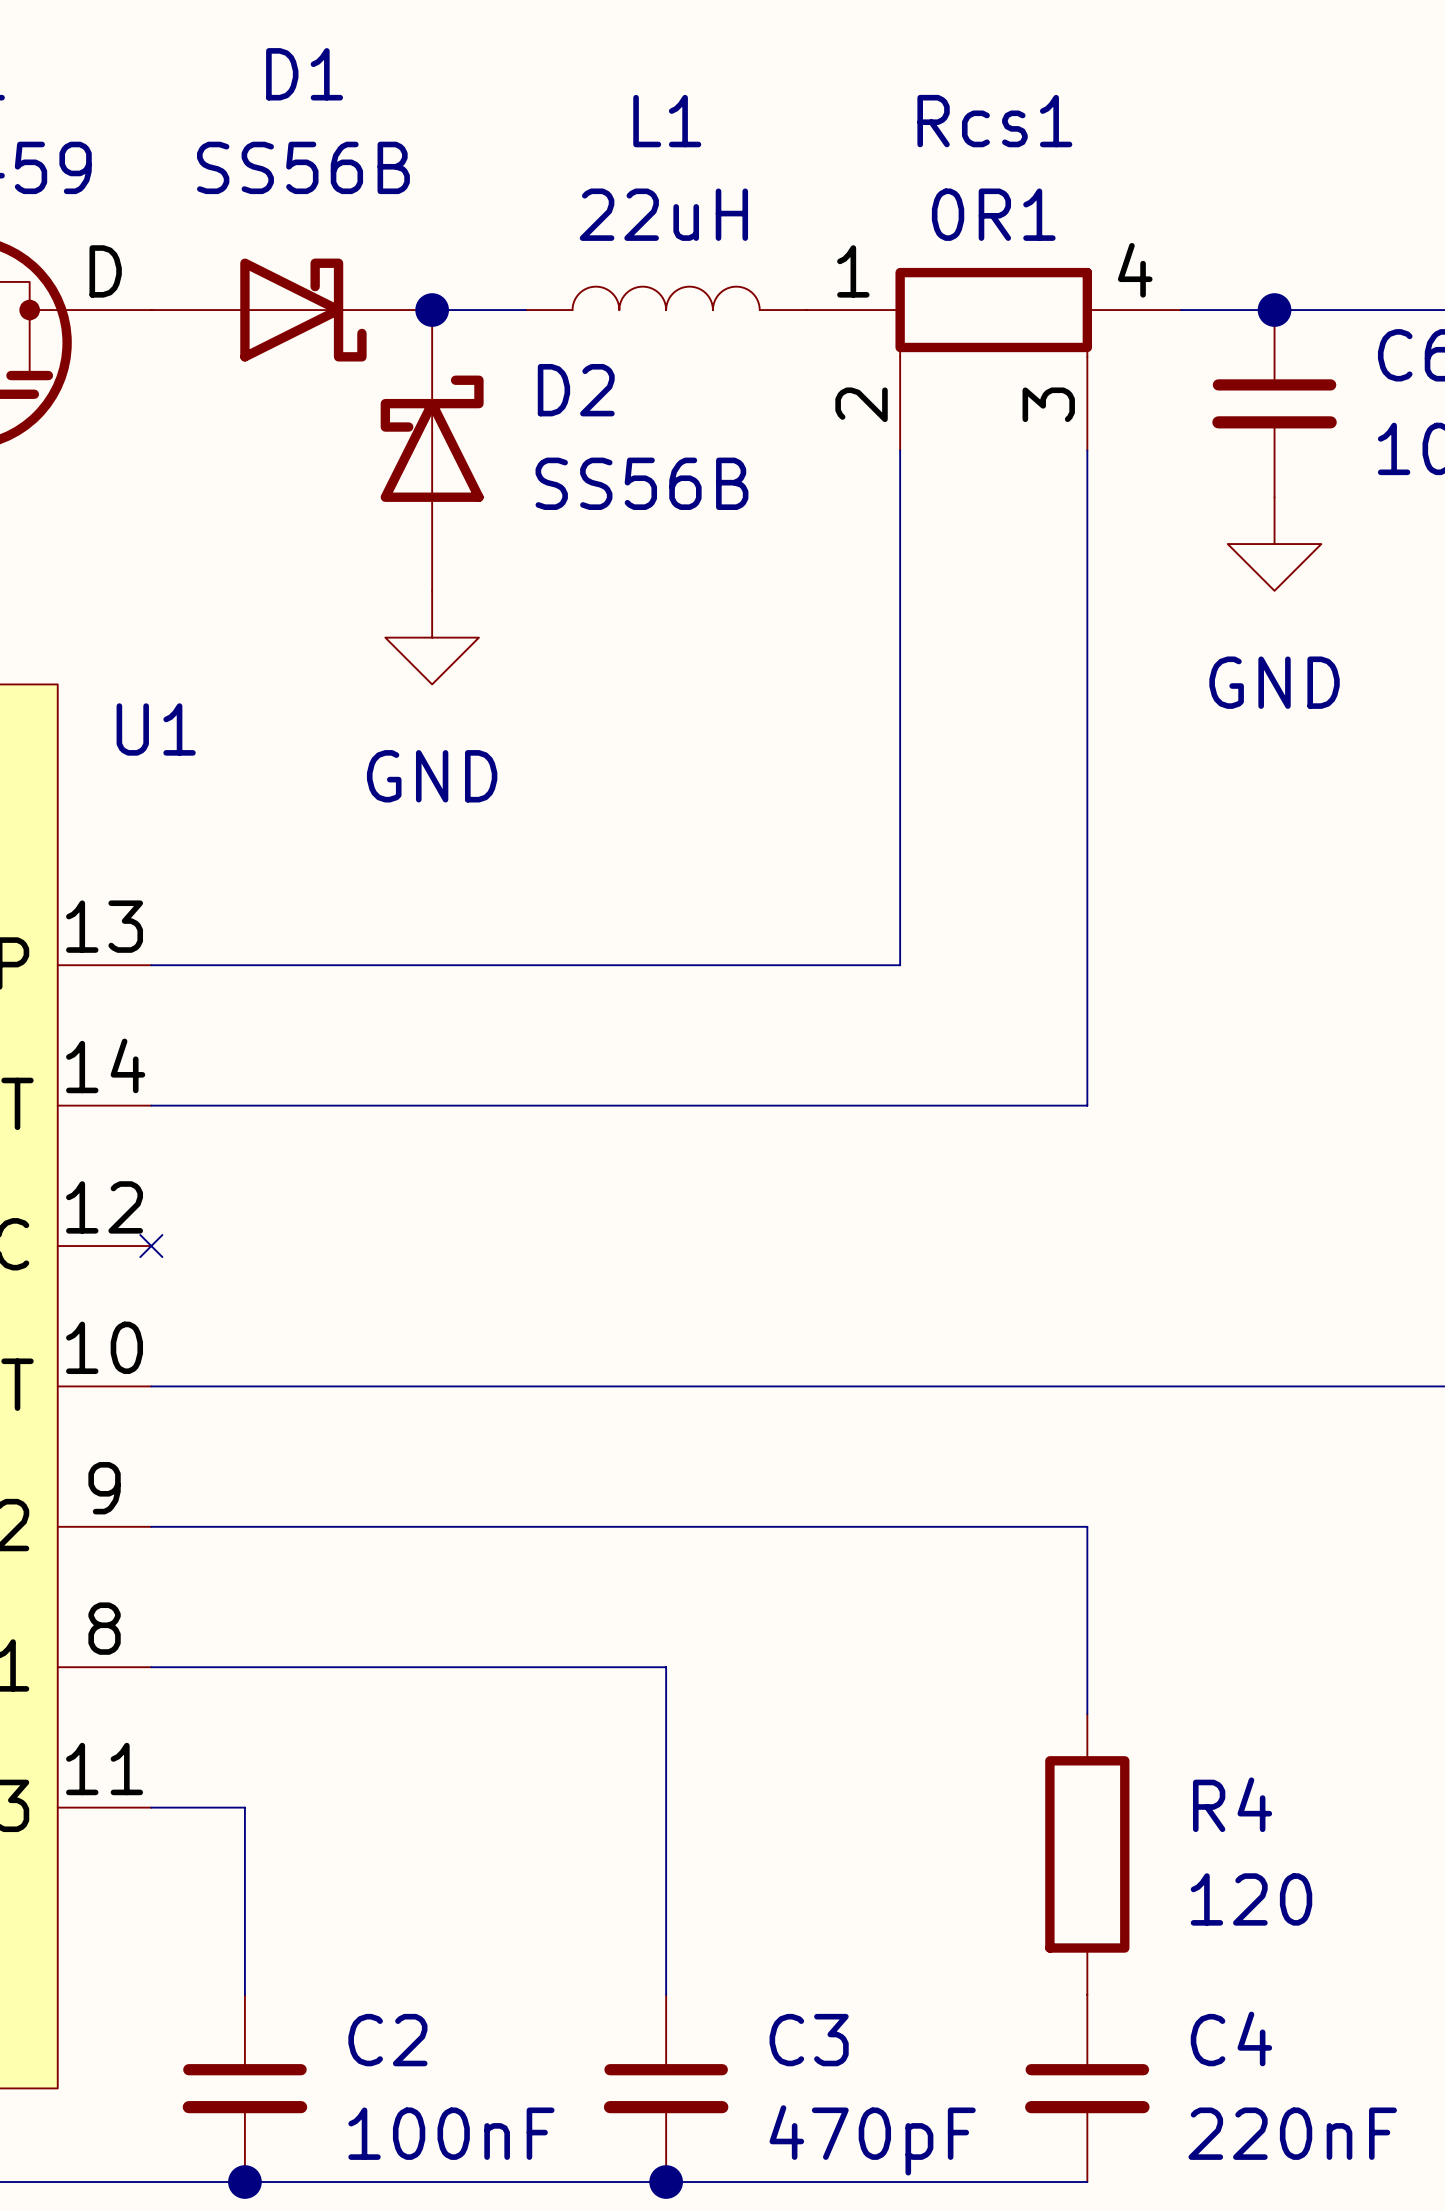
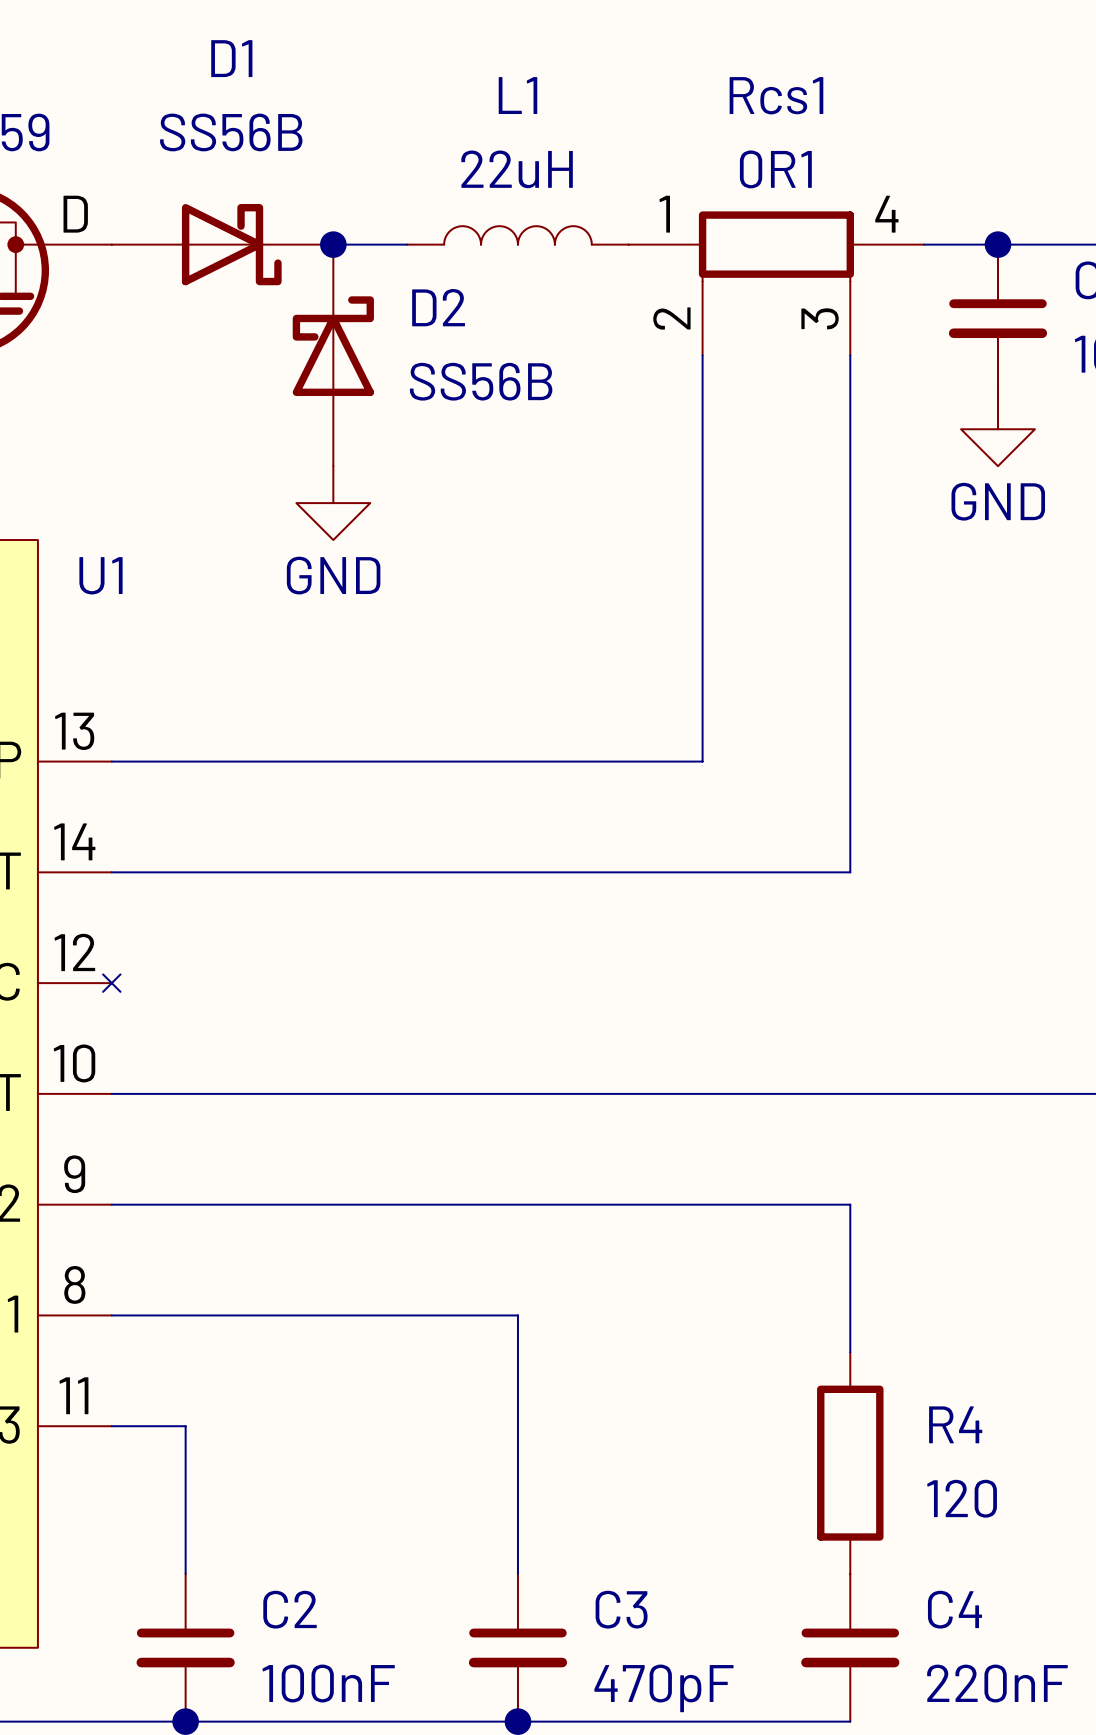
power symbol text position: GND (1274, 682) -> GND (998, 501)
power symbol text position: GND (432, 776) -> GND (333, 575)

